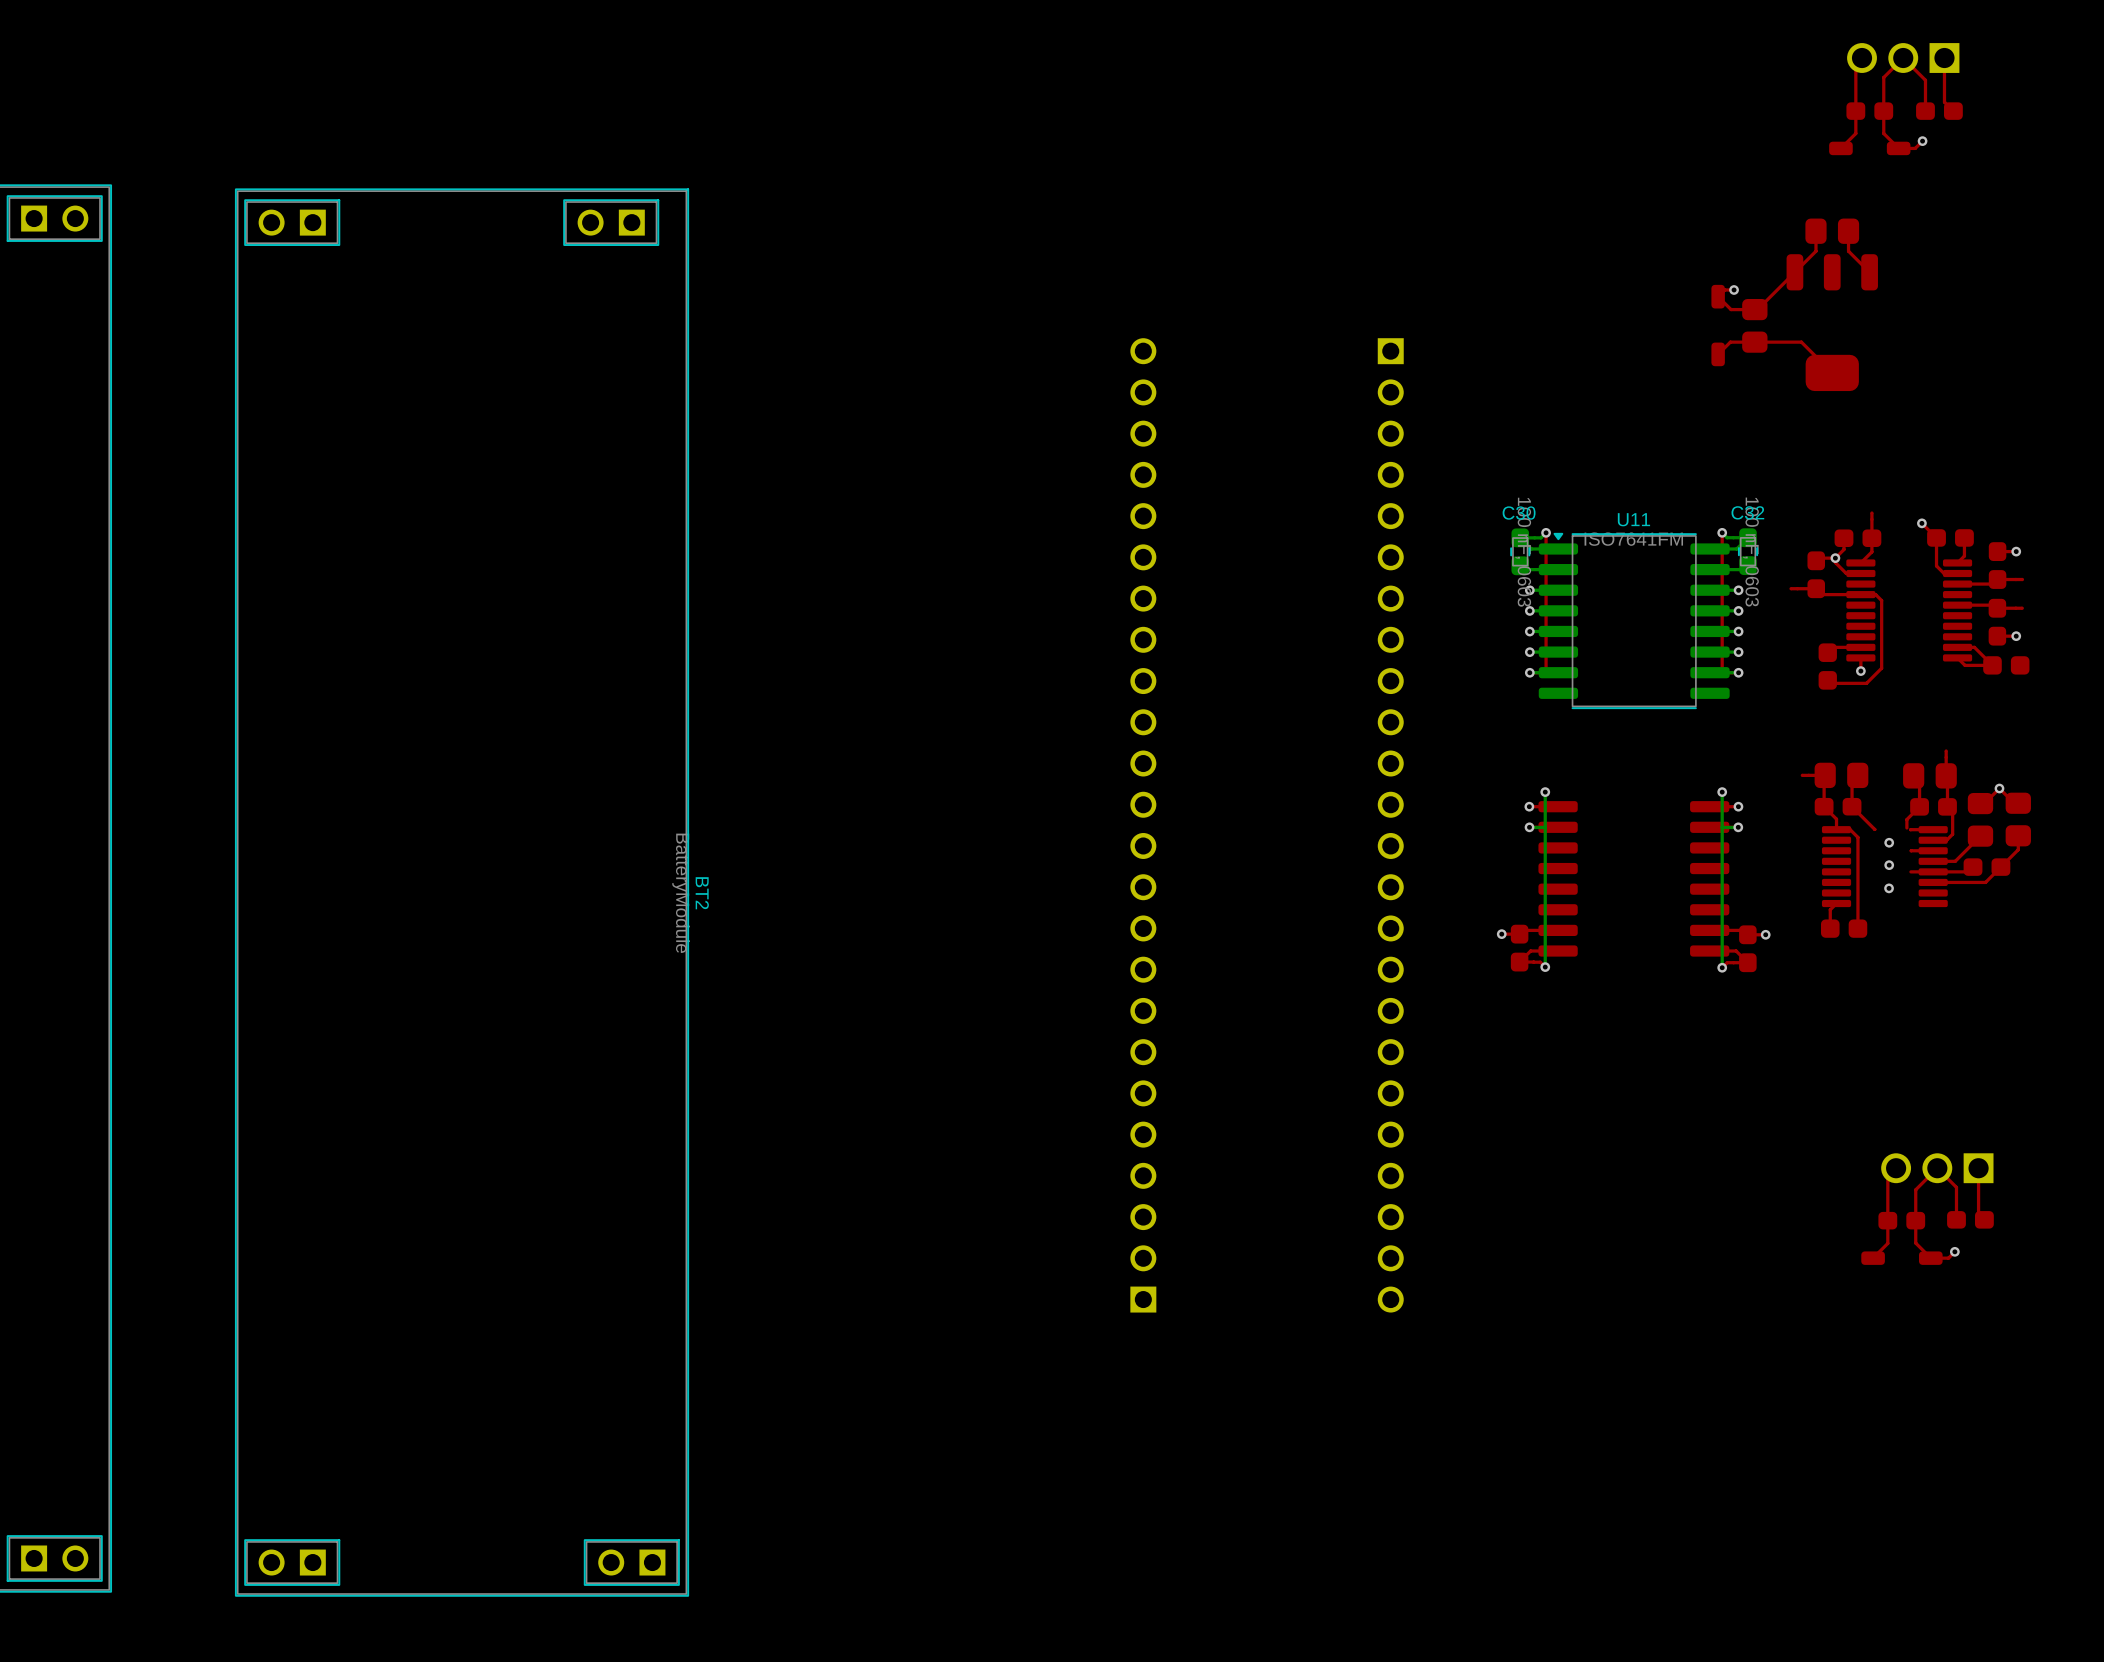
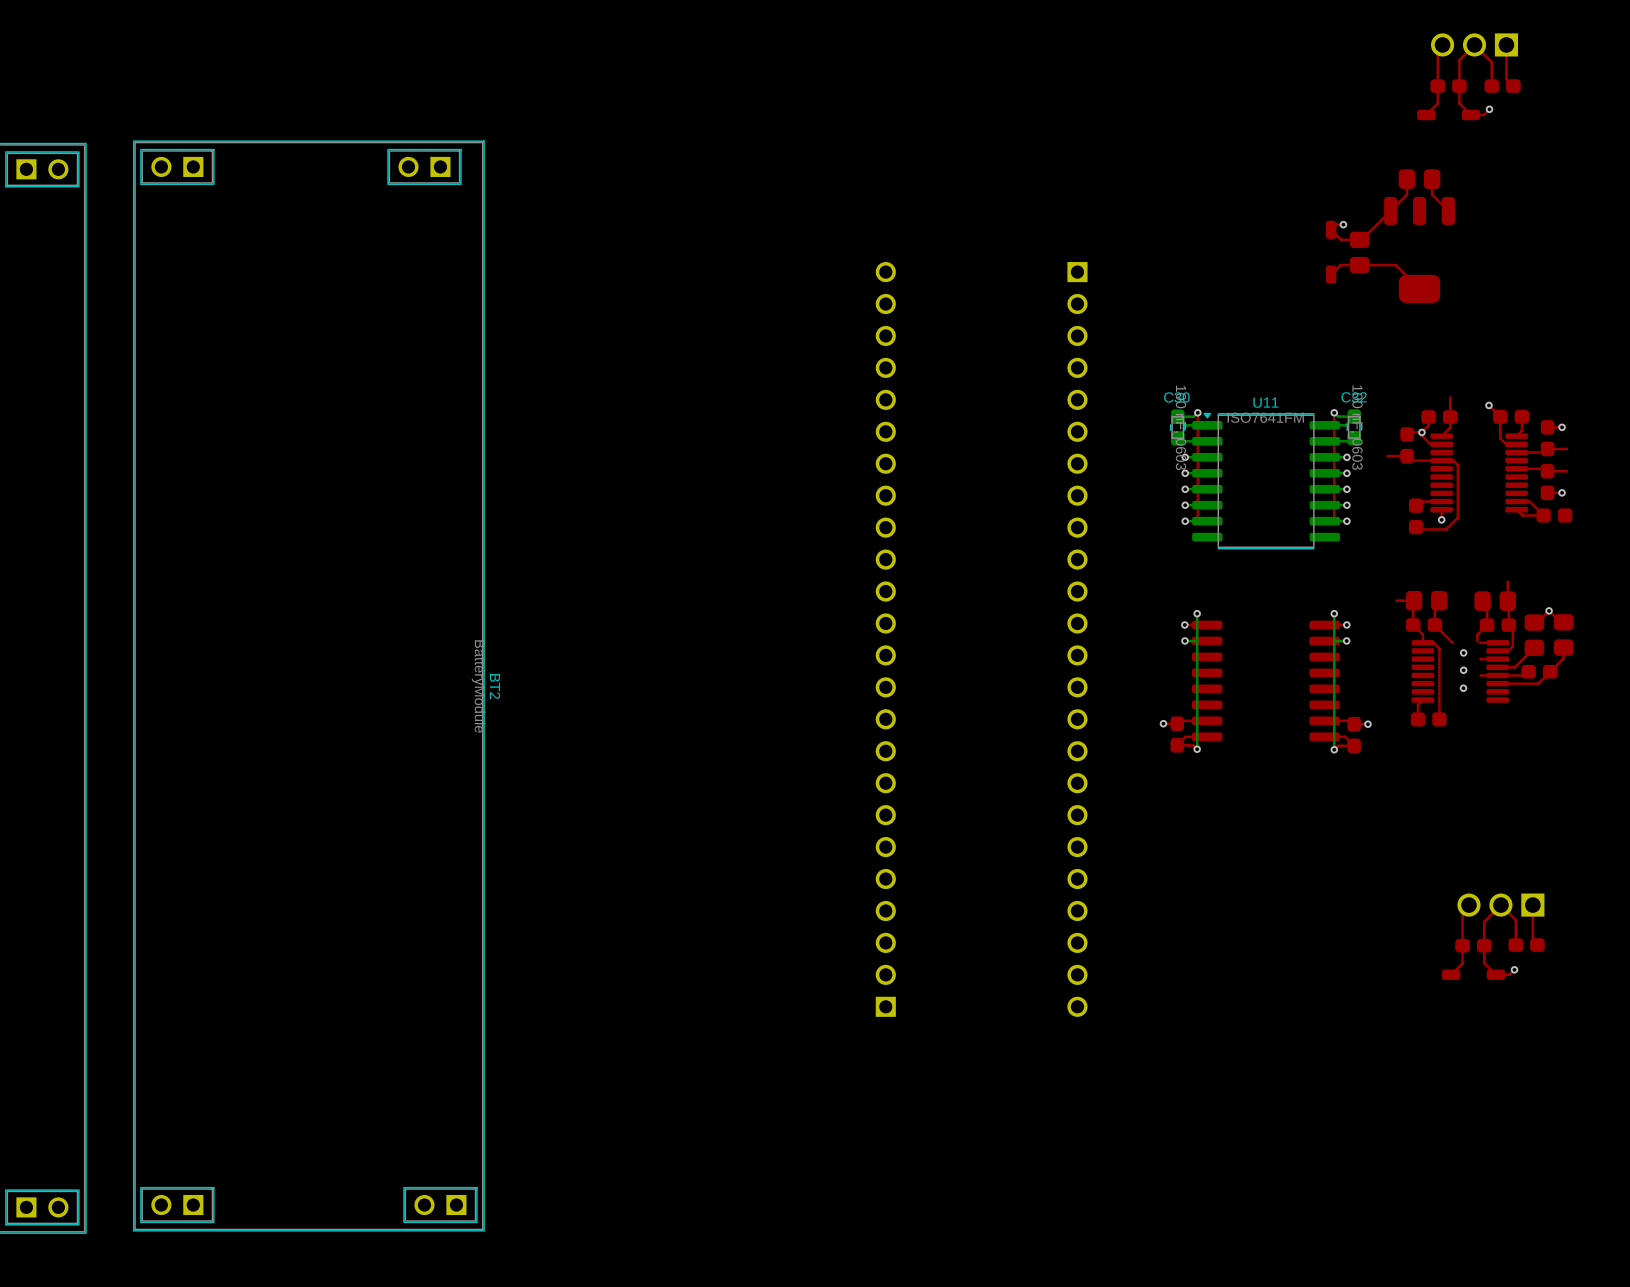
BT2 position: (462, 892) -> (308, 685)

